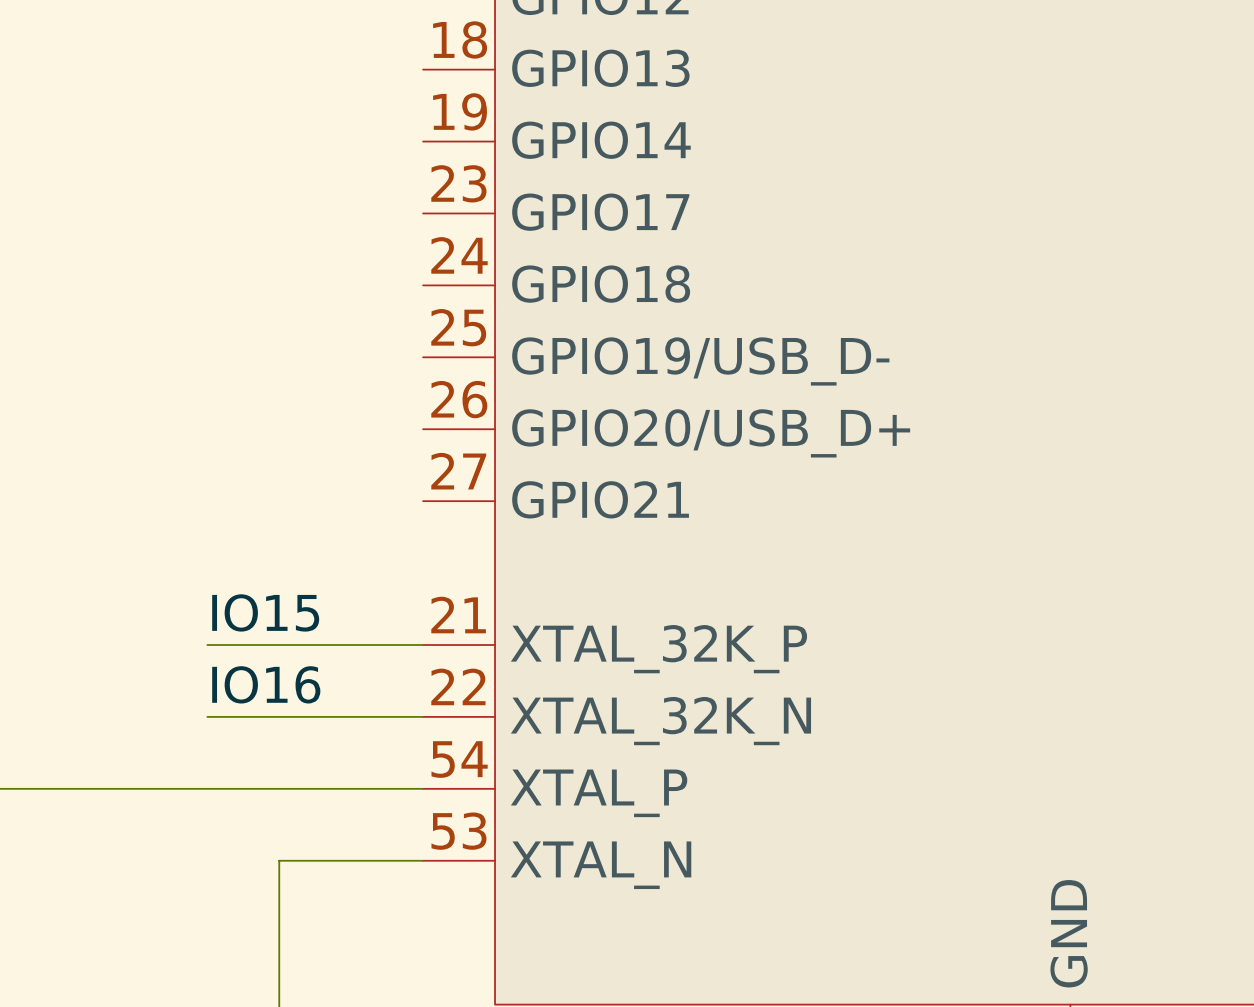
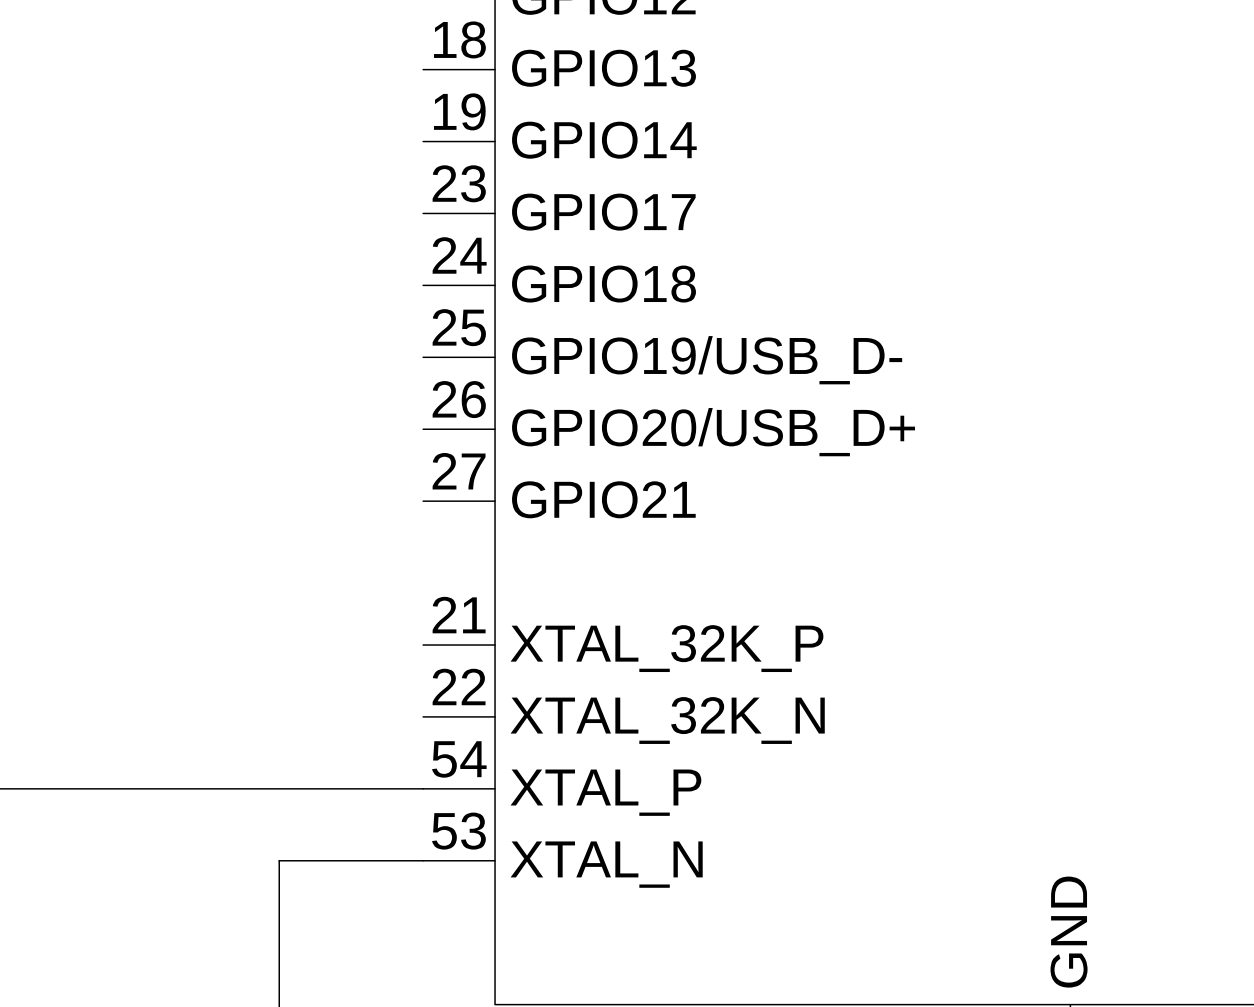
label: IO15 (265, 612) -> none
wire: (207, 645) (423, 645) -> none
label: IO16 (266, 684) -> none
wire: (207, 716) (423, 716) -> none

